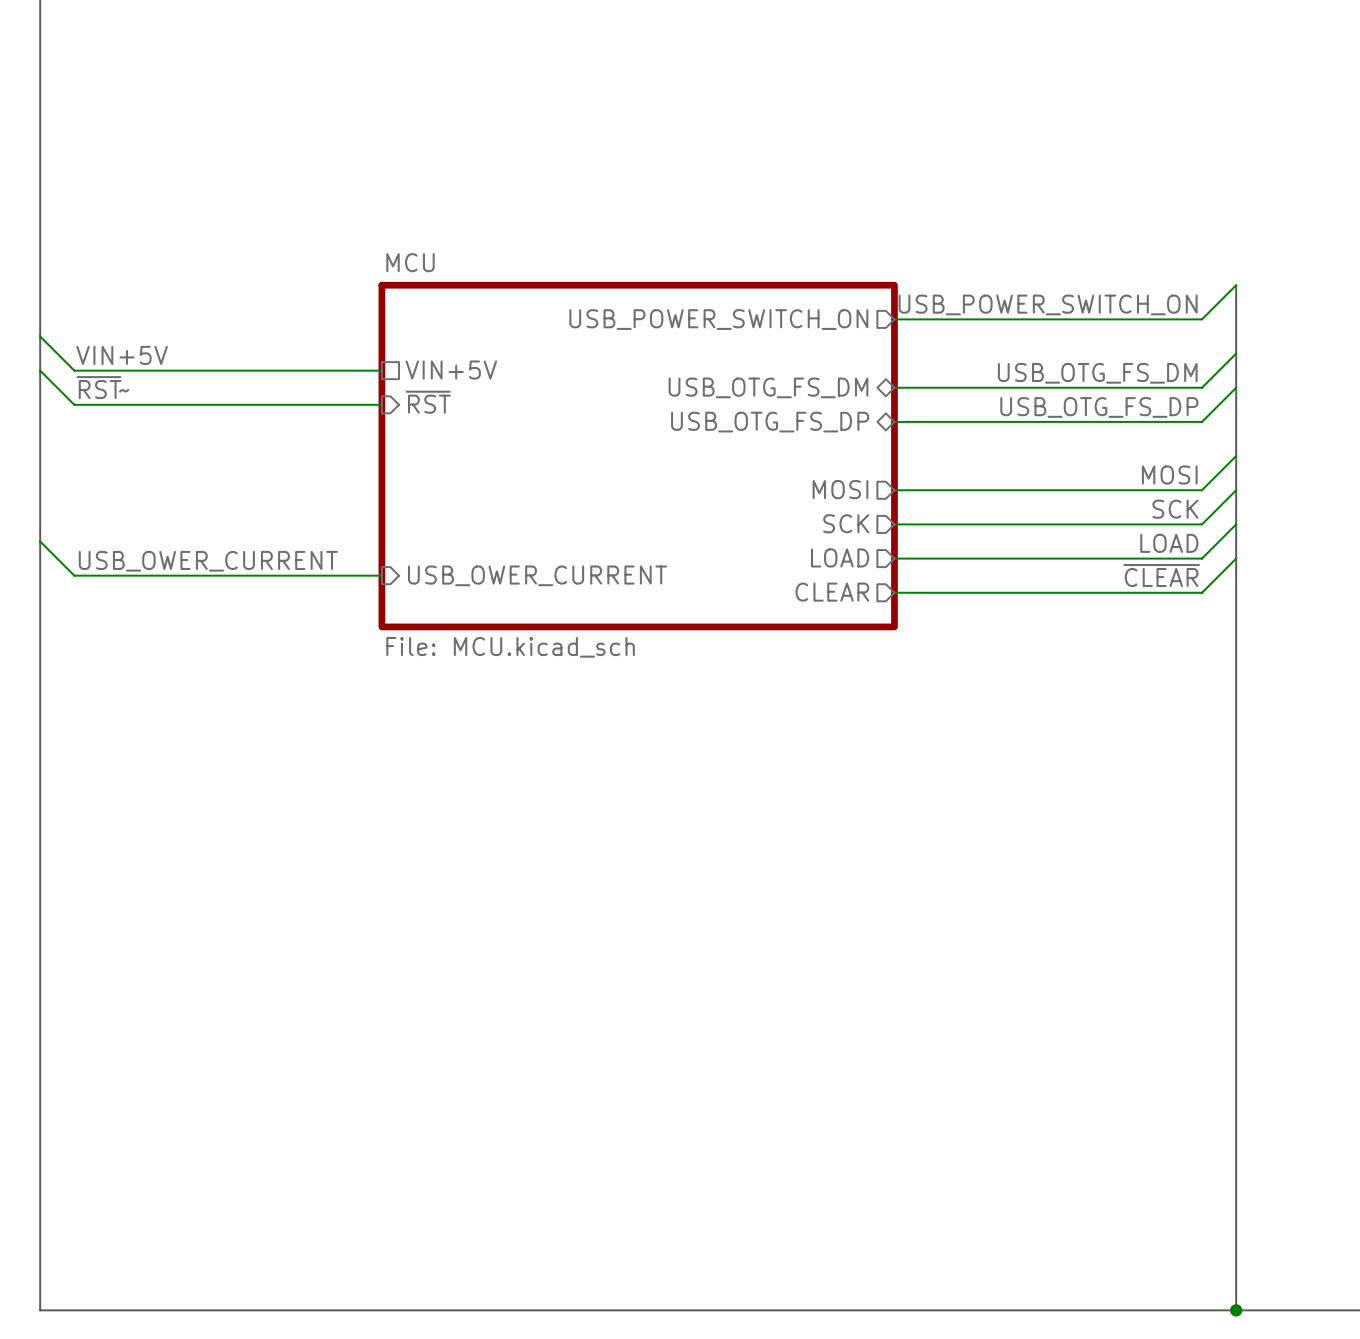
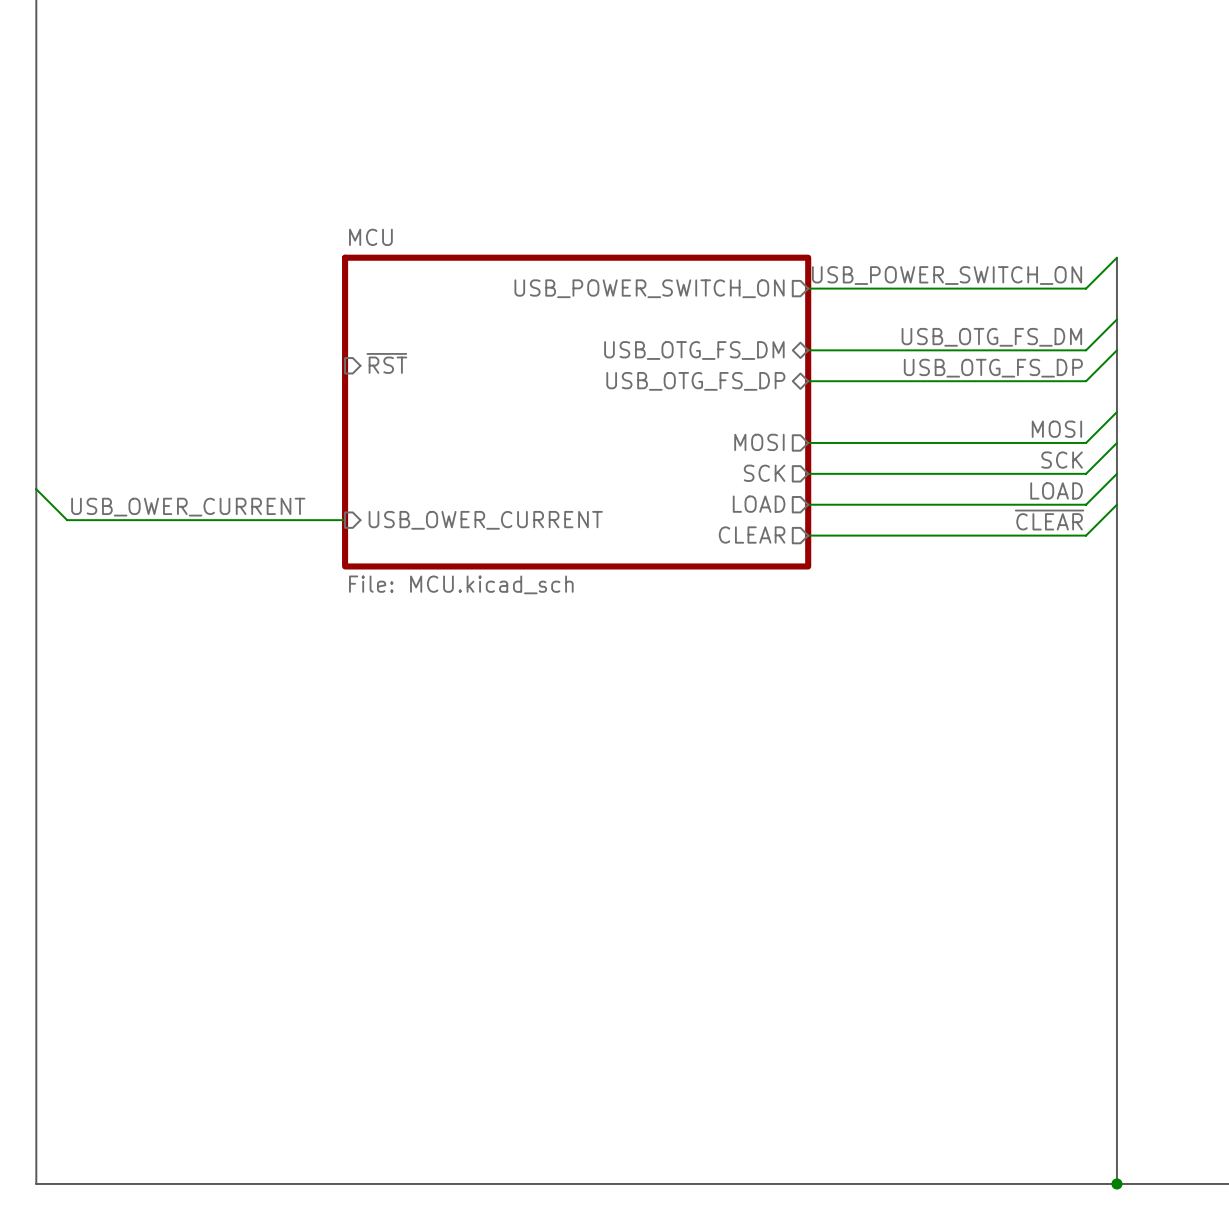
wire: (40, 336) (74, 370) (381, 370) -> none
label: VIN+5V (122, 355) -> none
wire: (40, 370) (74, 404) (381, 404) -> none
sheet pin: VIN+5V (451, 370) -> none
label: ~{RST} (98, 387) -> none
label: ~ (124, 390) -> none

